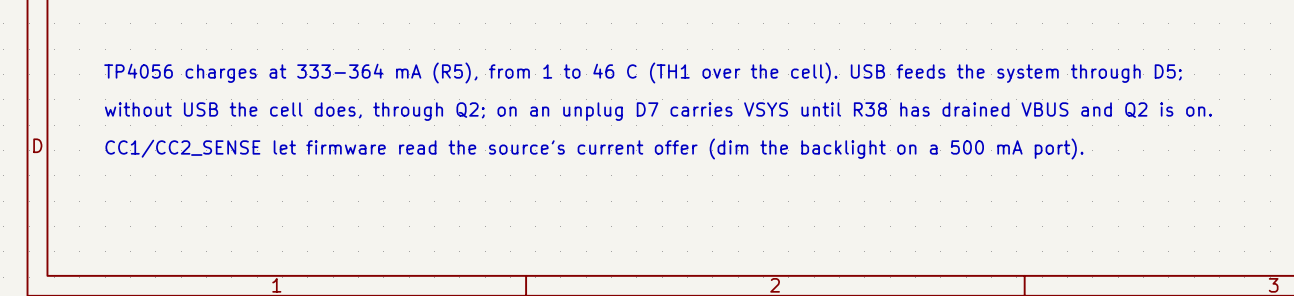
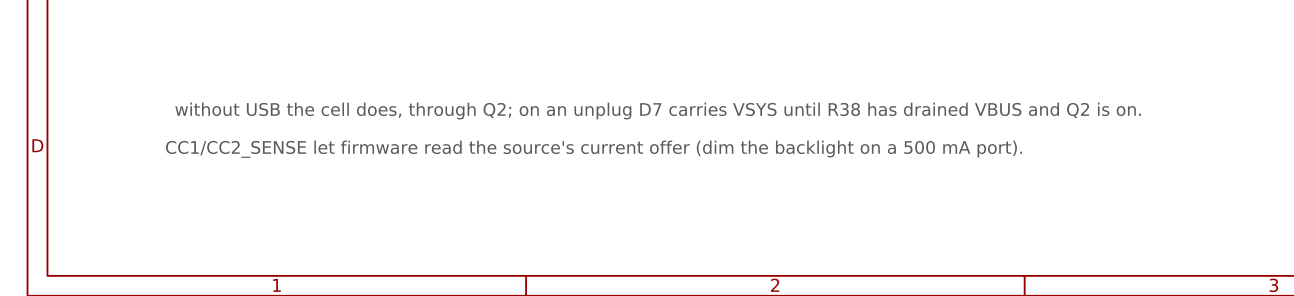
text: TP4056 charges at 333-364 mA (R5), from 1 to 46 C (TH1 over the cell). USB feeds the system through D5; (642, 72) -> none

